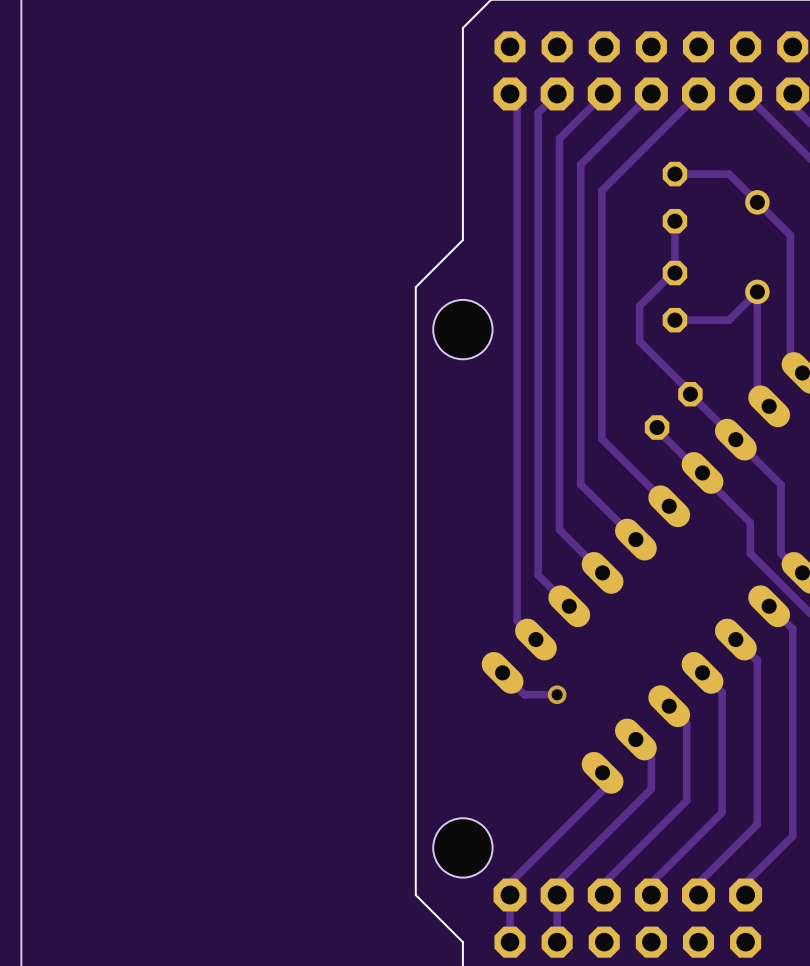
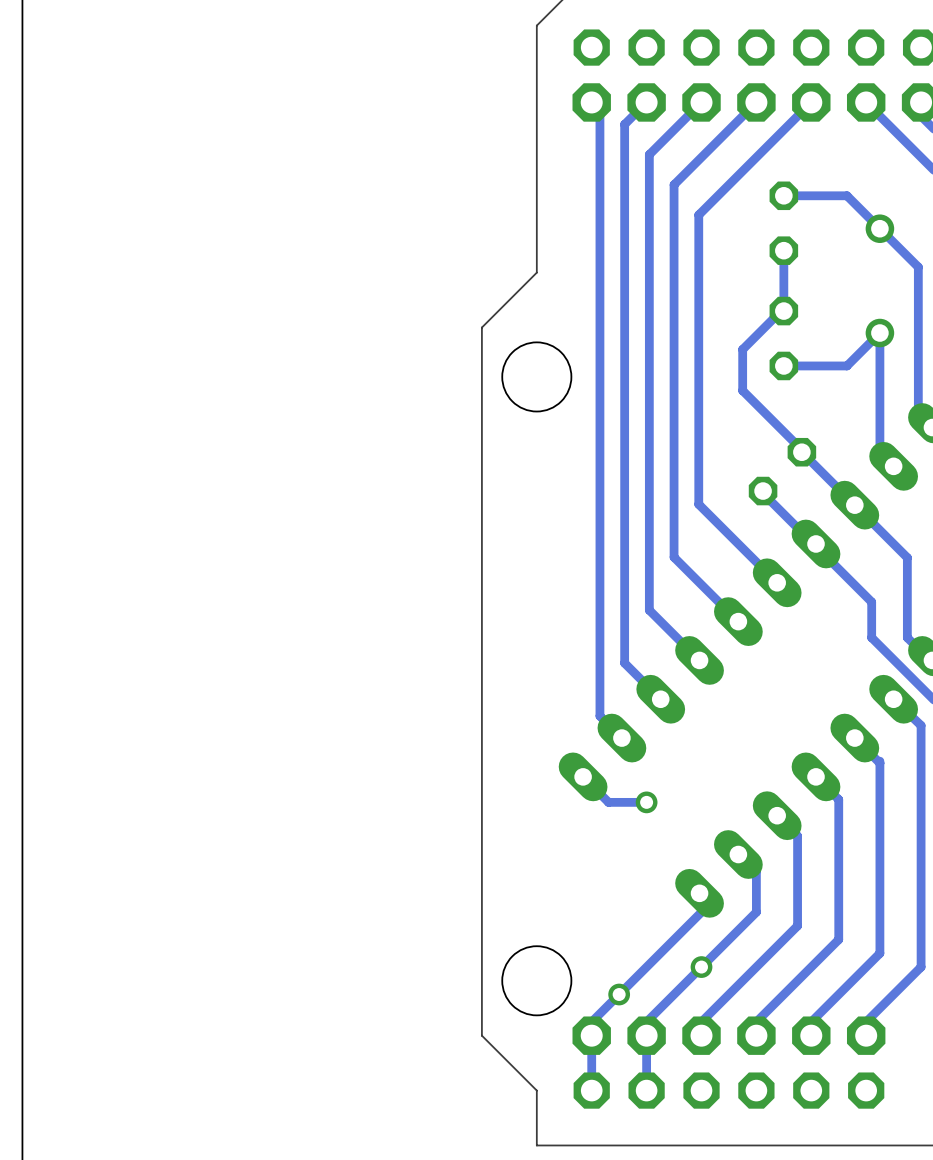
via: none -> (701, 967)
via: none -> (619, 994)

